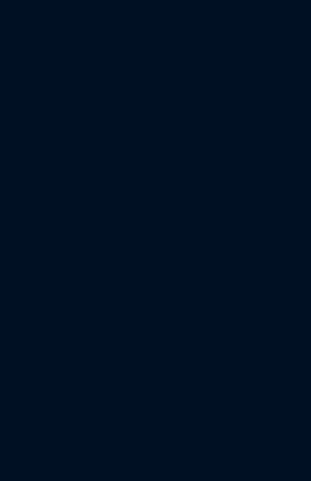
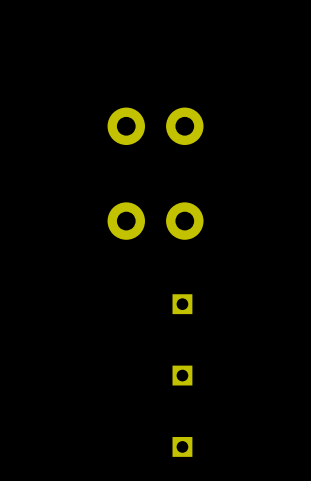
part: none -> (155, 126)
part: none -> (155, 221)
part: none -> (182, 304)
part: none -> (182, 375)
part: none -> (182, 446)

